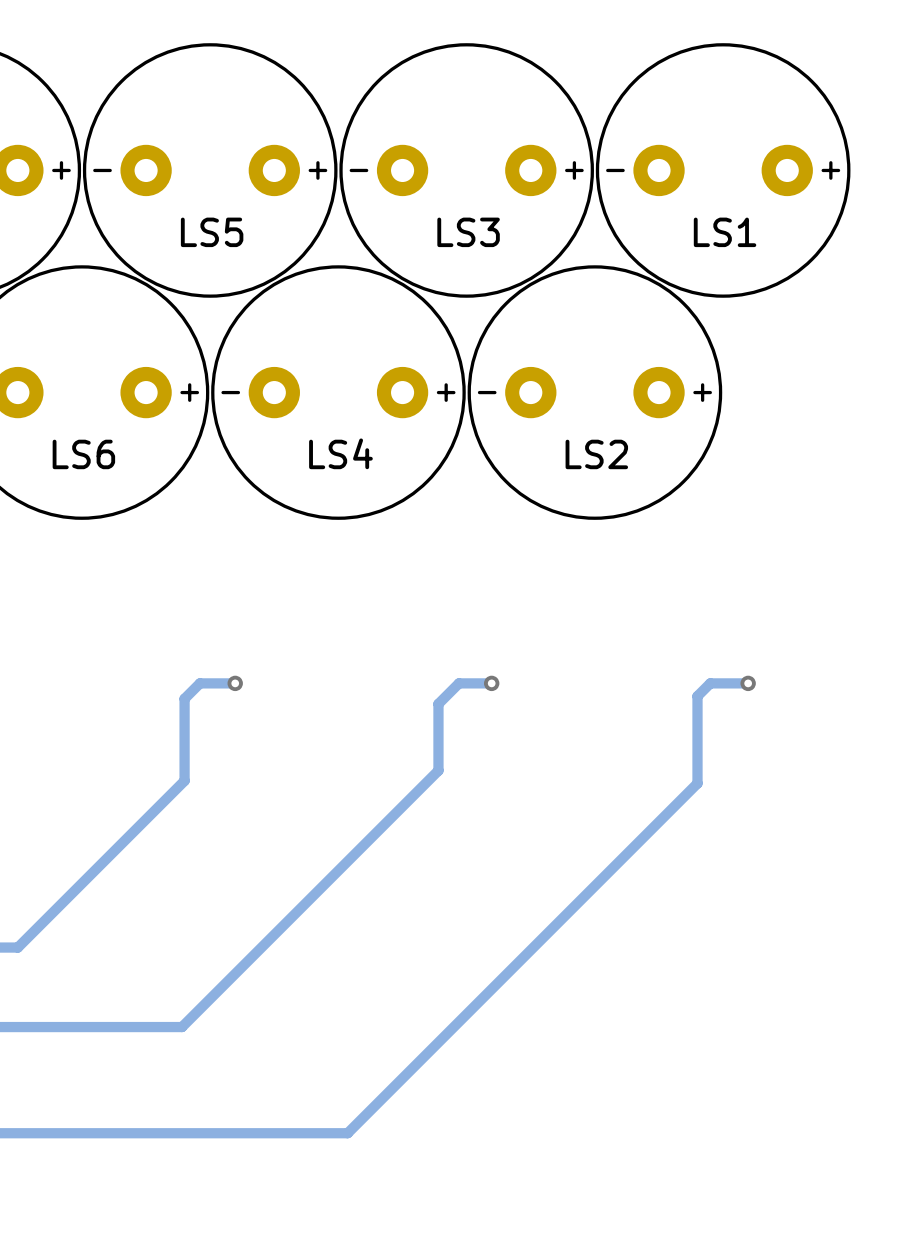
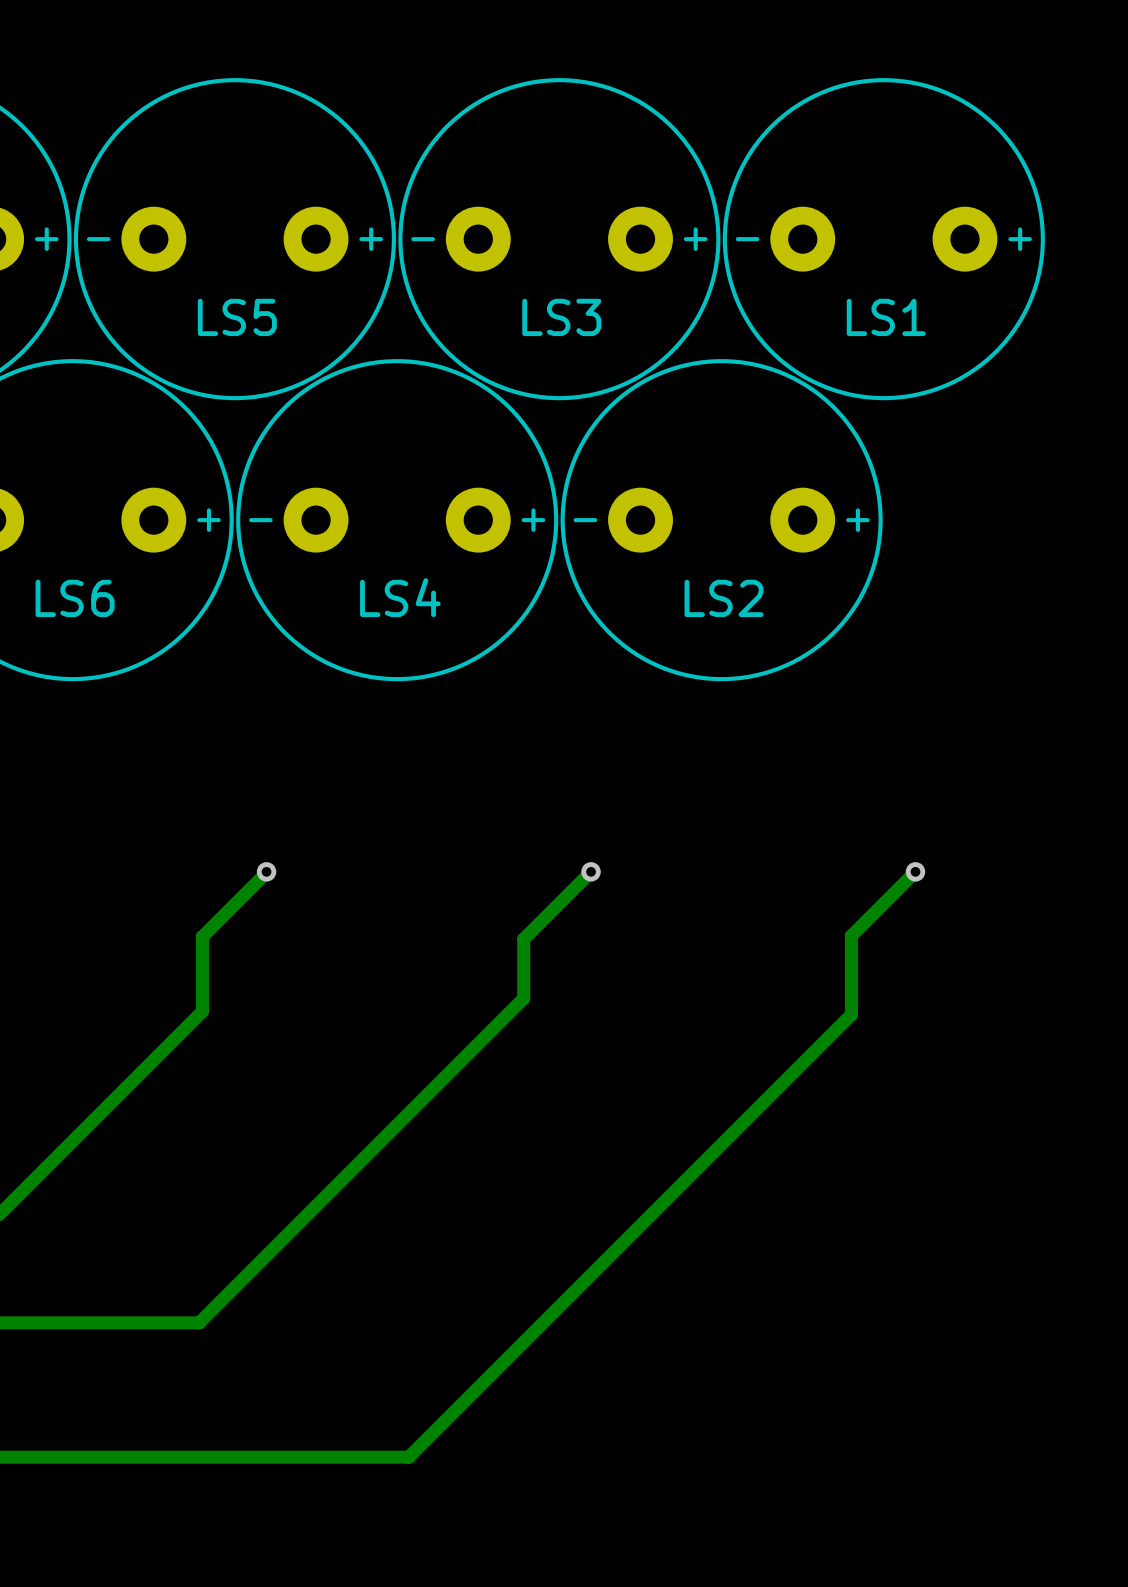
track: (235, 683) (199, 683) (184, 698) (184, 721) -> (264, 875) (202, 936)
via position: (235, 683) -> (266, 871)
track: (491, 683) (458, 683) (438, 703) (438, 723) -> (591, 871) (523, 939)
via position: (491, 683) -> (591, 871)
track: (748, 683) (710, 683) (697, 696) (697, 721) -> (915, 875) (915, 871) (851, 935)
via position: (748, 683) -> (915, 871)

